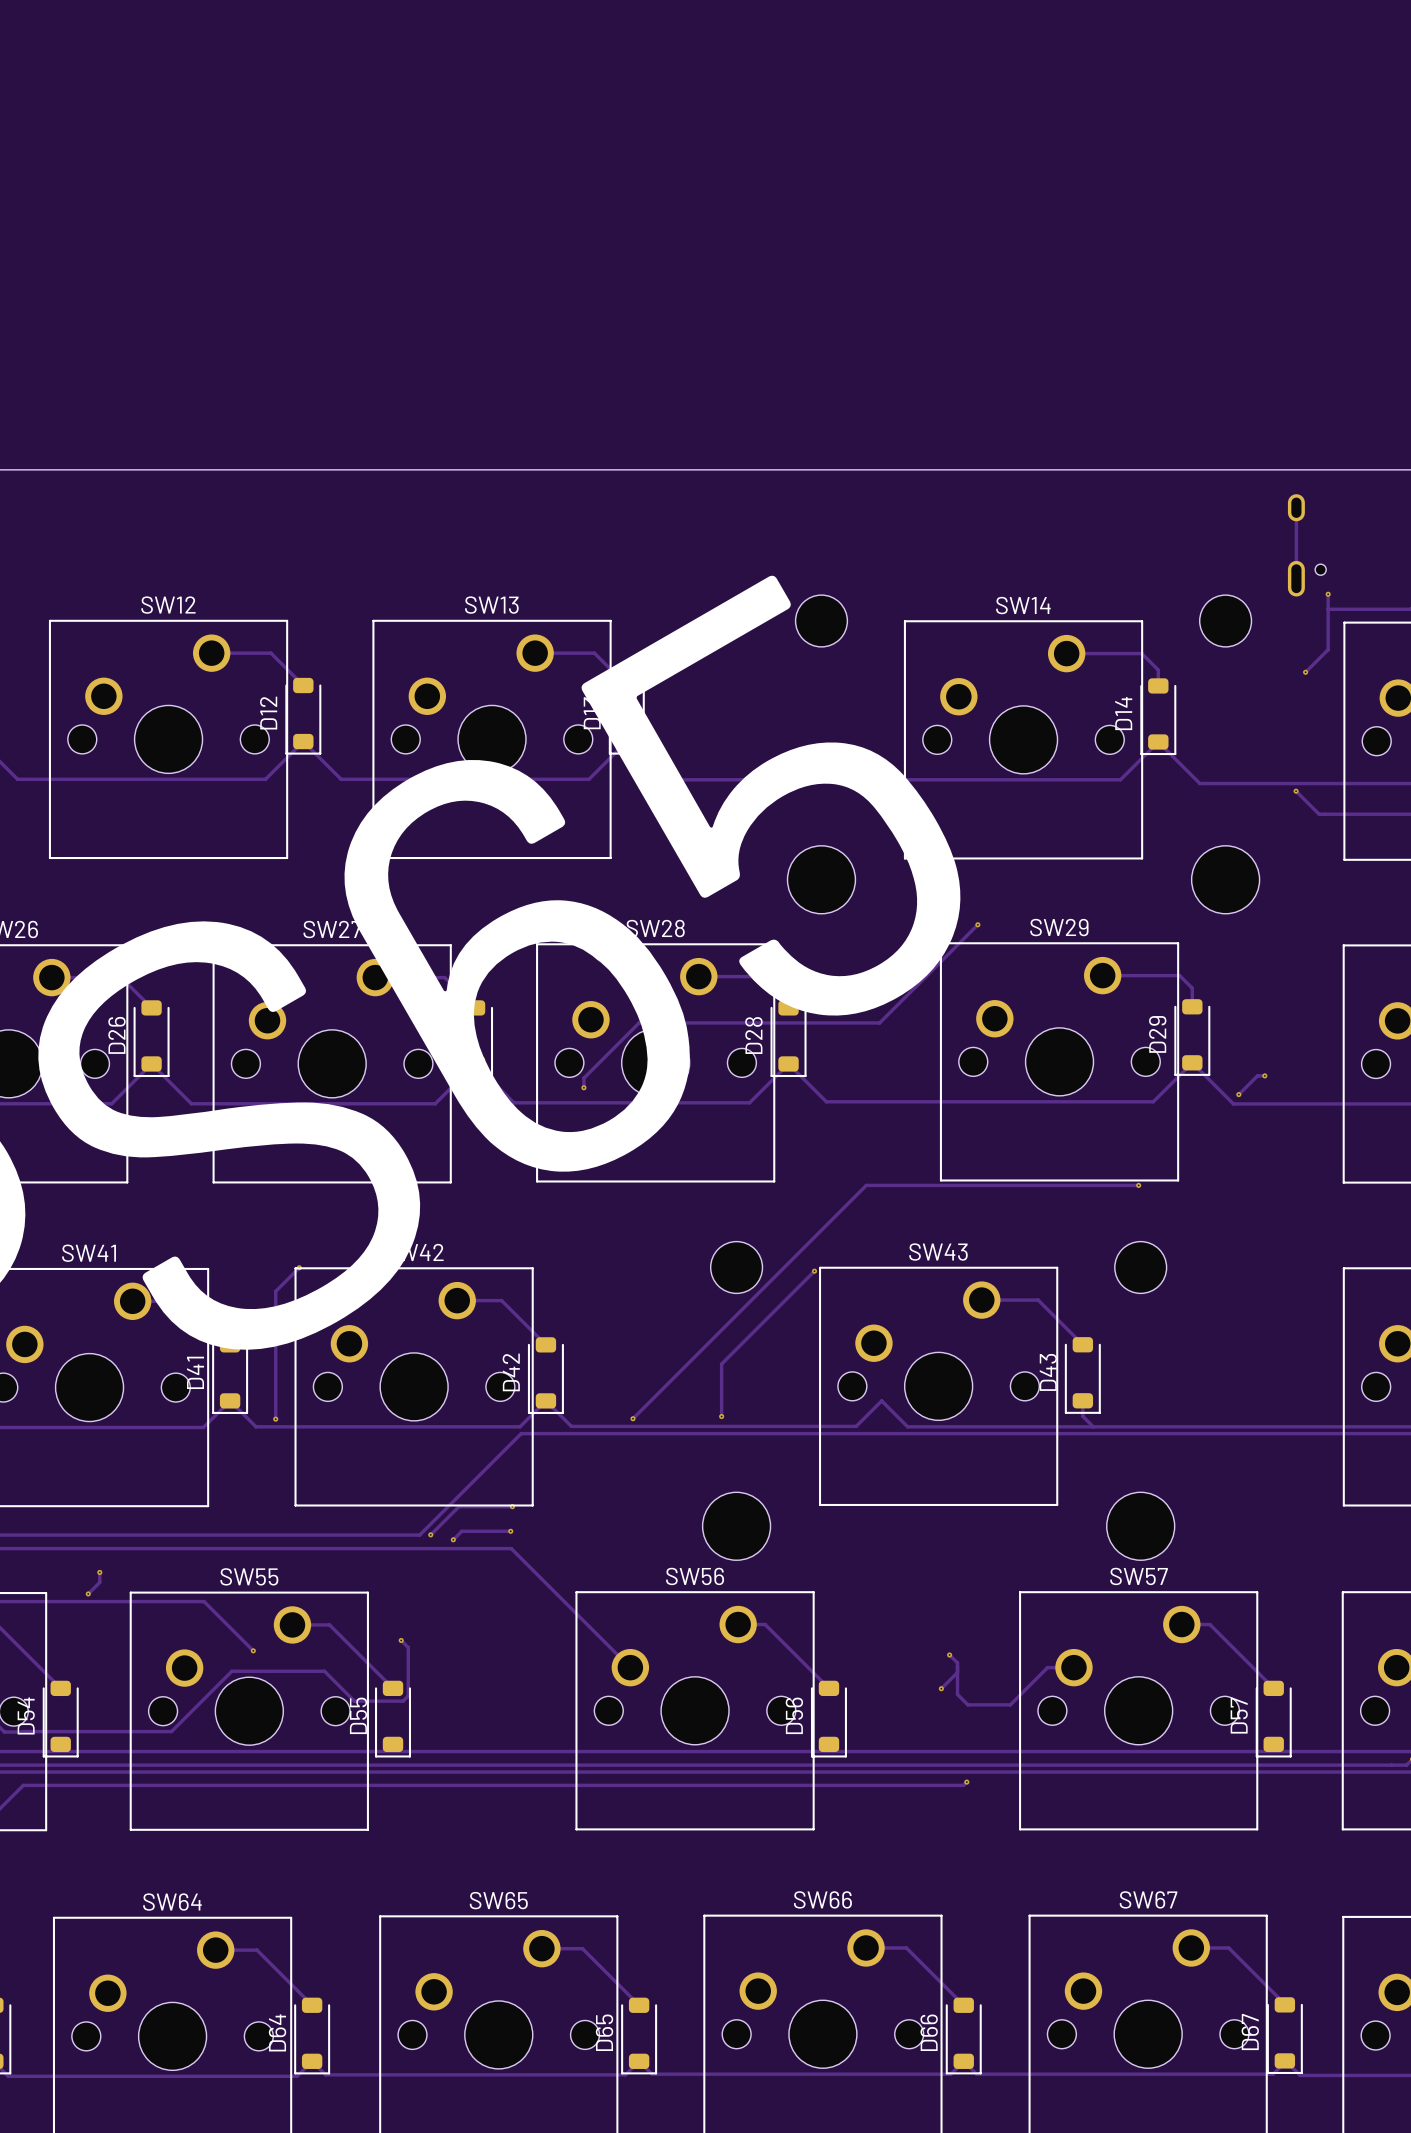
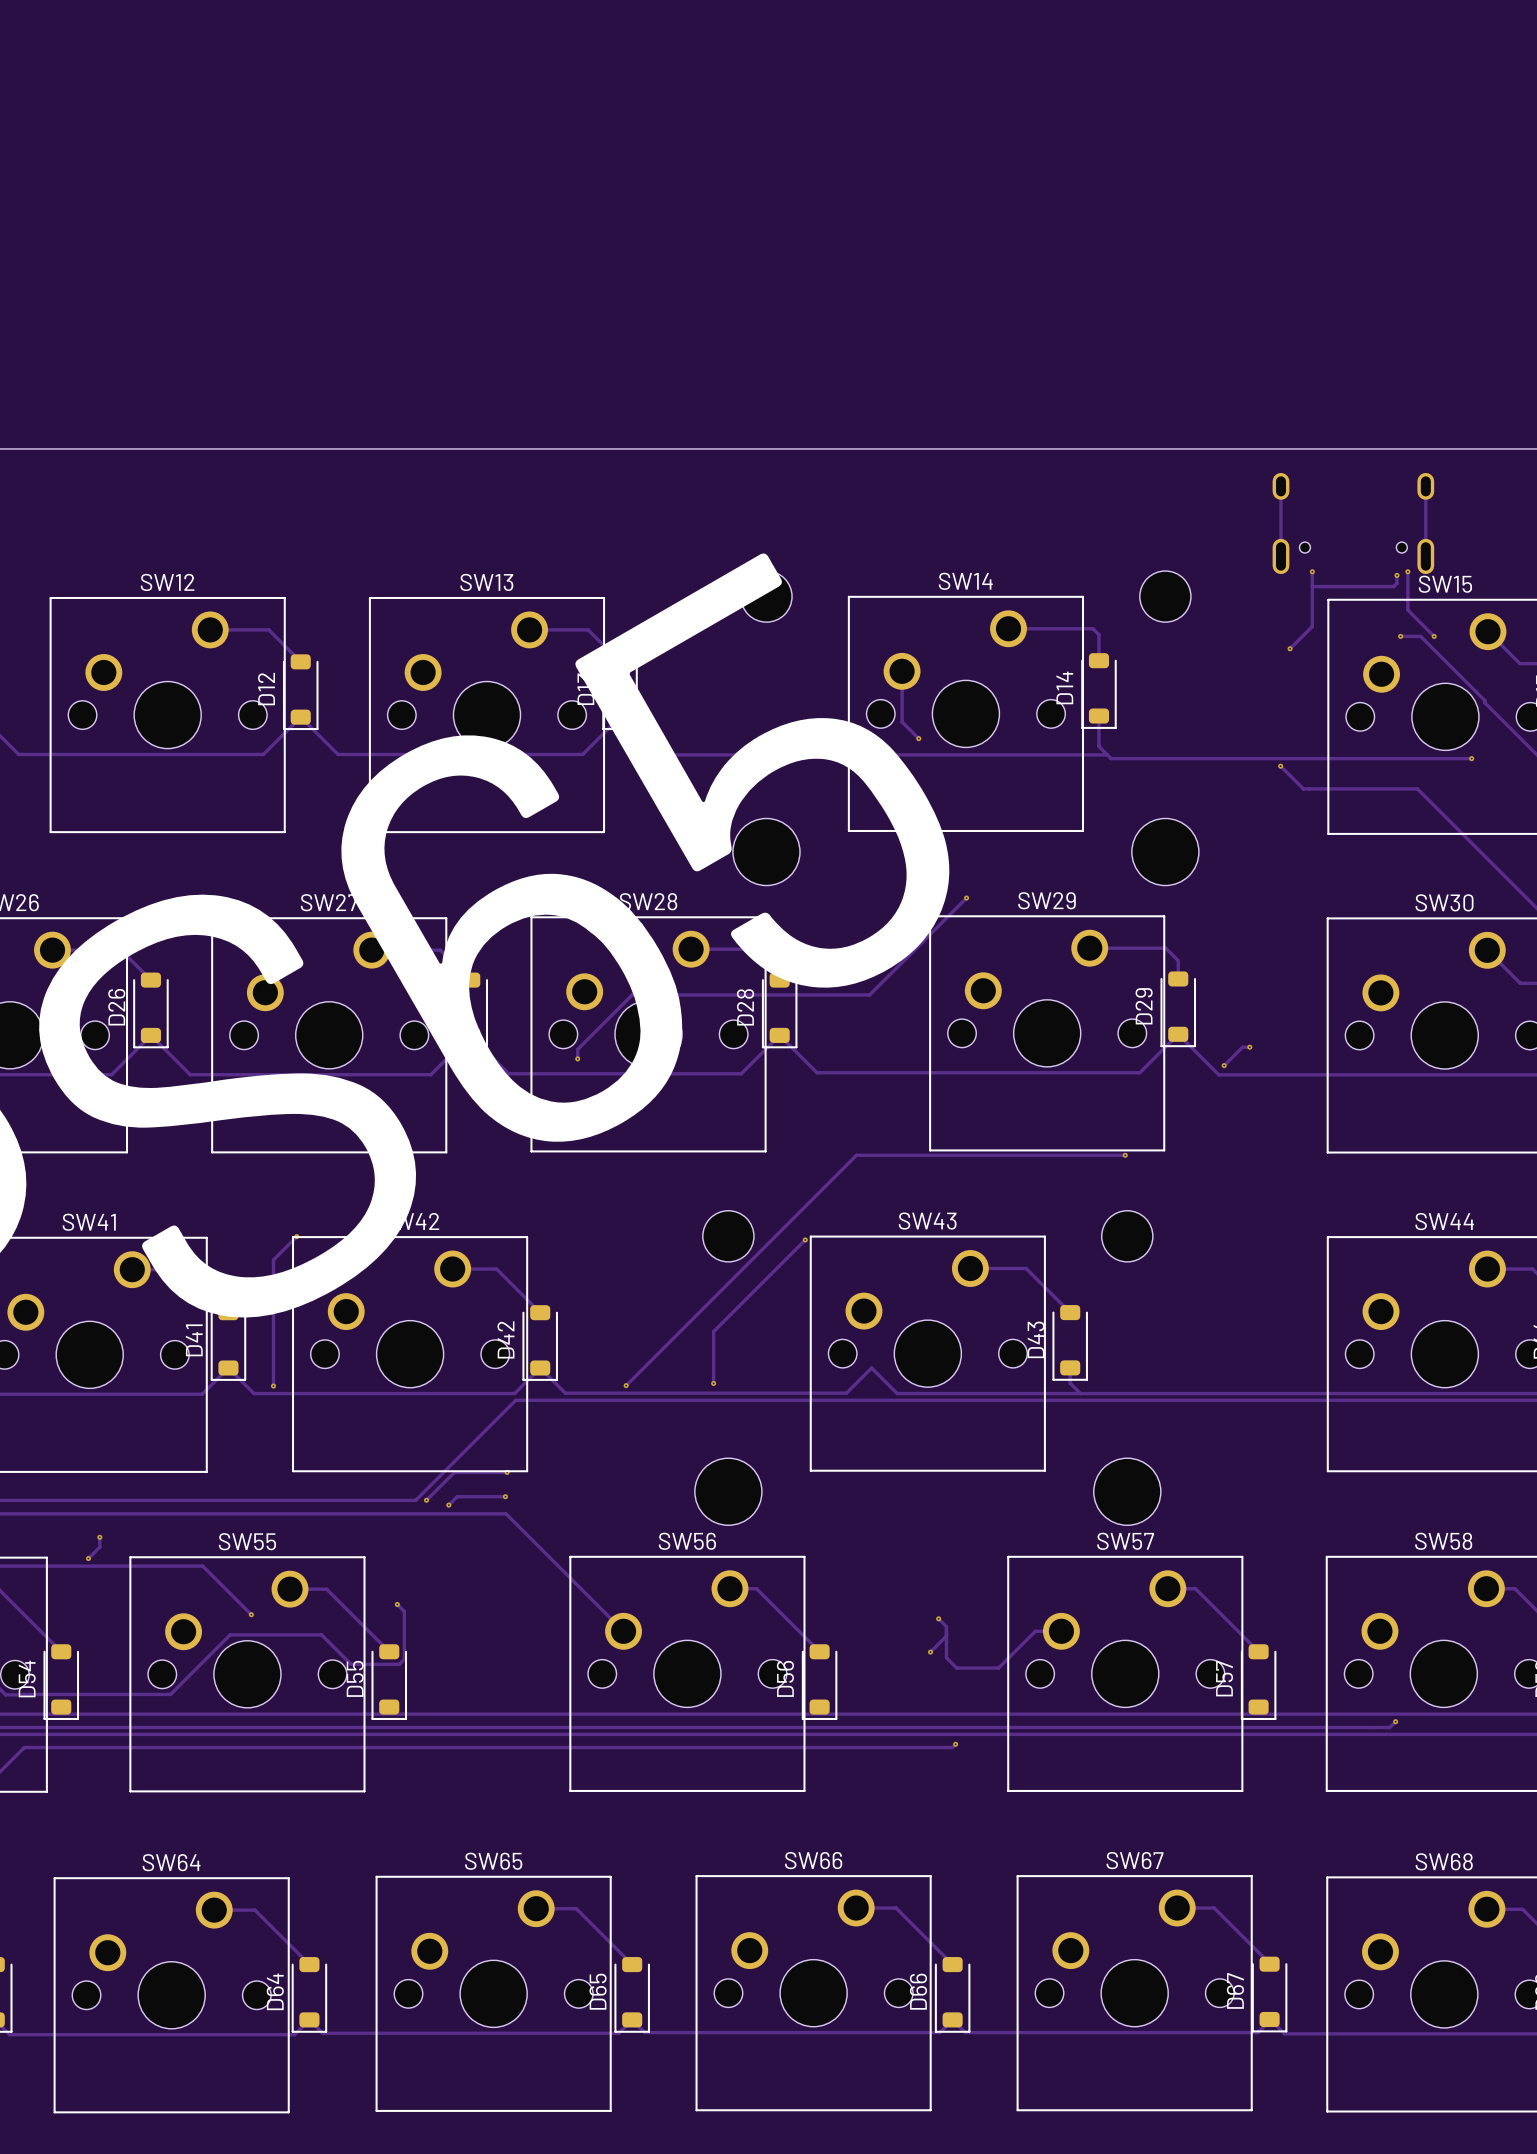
track: none -> (1008, 628) (1093, 628) (1098, 634) (1098, 660)
track: (1066, 653) (1141, 653) (1158, 670) (1158, 685) -> none
track: none -> (902, 671) (902, 721) (918, 738)
D14 position: (1158, 716) -> (1098, 691)
SW14 position: (1023, 754) -> (965, 728)
via: none -> (918, 738)
track: (1120, 779) (1158, 741) (1199, 783) -> (1098, 716) (1098, 746) (1111, 758) (1185, 758)

